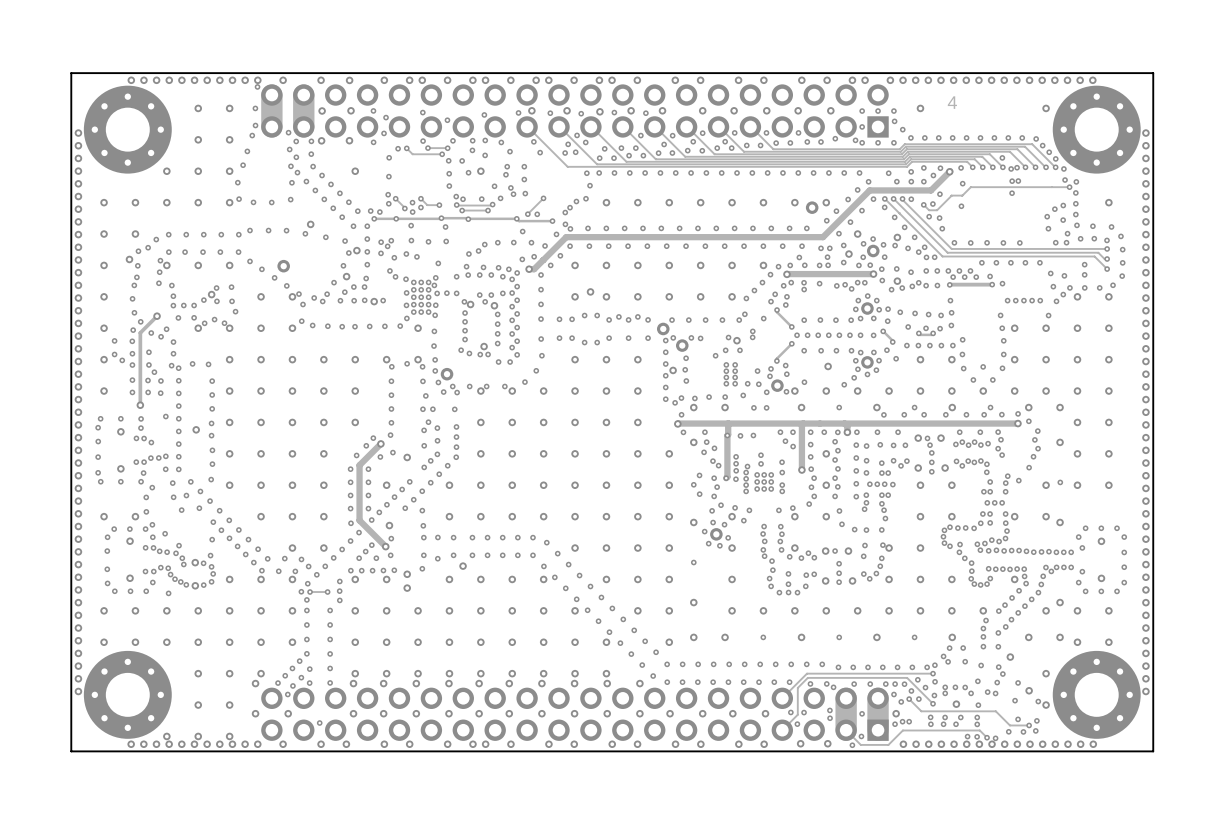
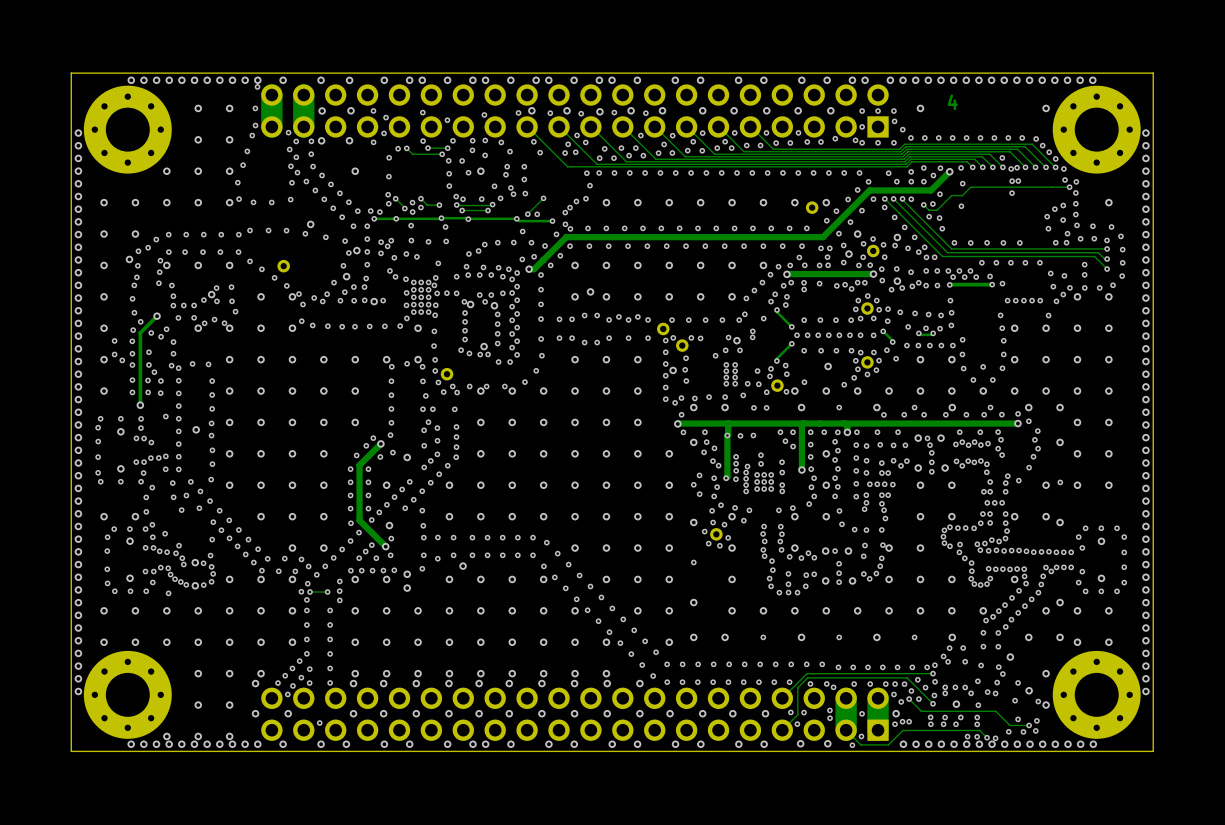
via: none -> (993, 616)
via: (983, 628) -> none
via: none -> (983, 632)
via: (983, 636) -> none

